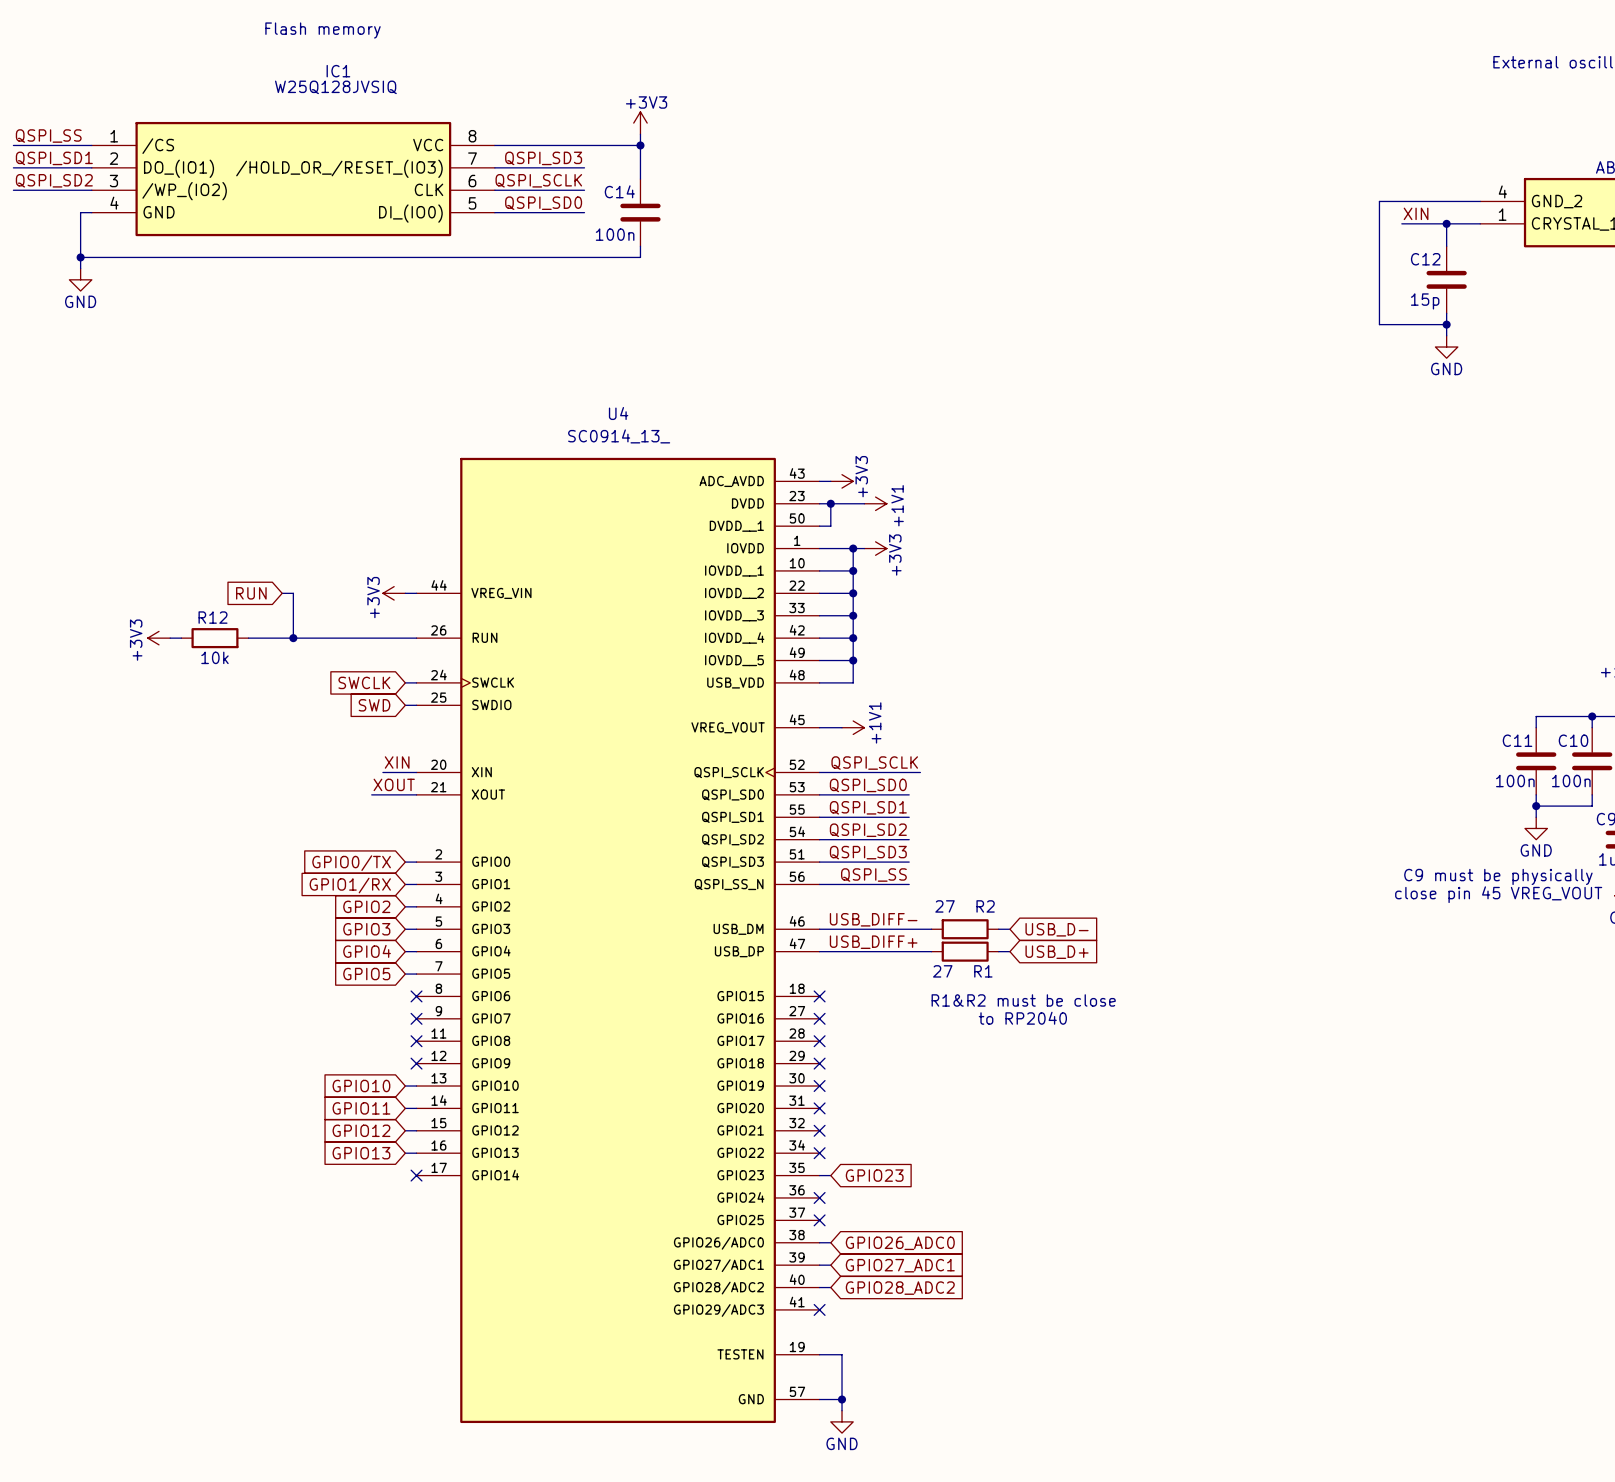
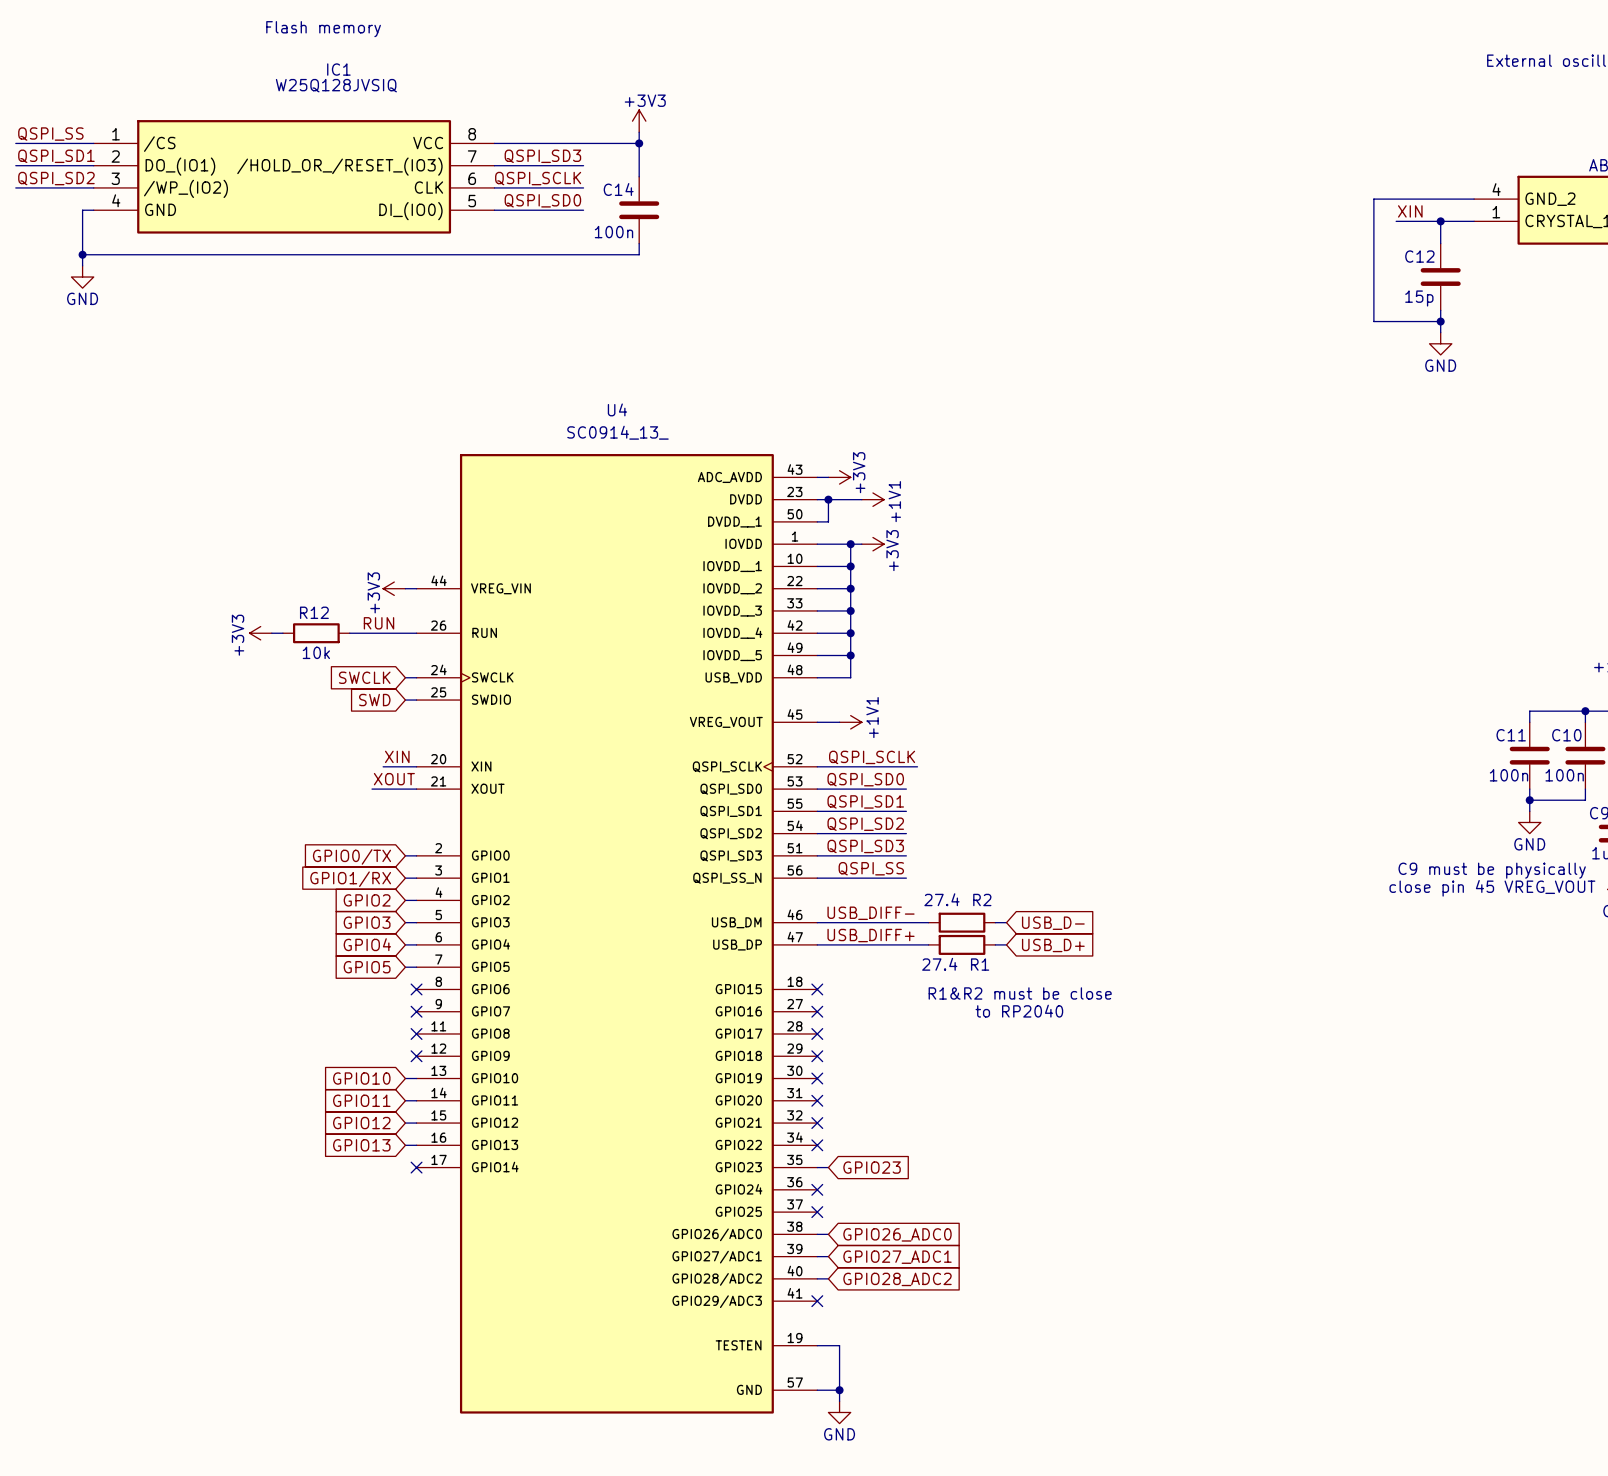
global label: RUN (251, 593) -> none
wire: (282, 593) (293, 593) (293, 638) -> none
label: none -> RUN (378, 623)
power symbol position: +3V3 (158, 638) -> +3V3 (260, 633)
wire: (170, 638) (181, 638) -> none
R12 position: (214, 638) -> (316, 633)
wire: (282, 638) (349, 638) -> none
junction: (293, 638) -> none
R2 value: 27 (945, 906) -> 27.4 (941, 899)
R1 value: 27 (942, 971) -> 27.4 (939, 964)

